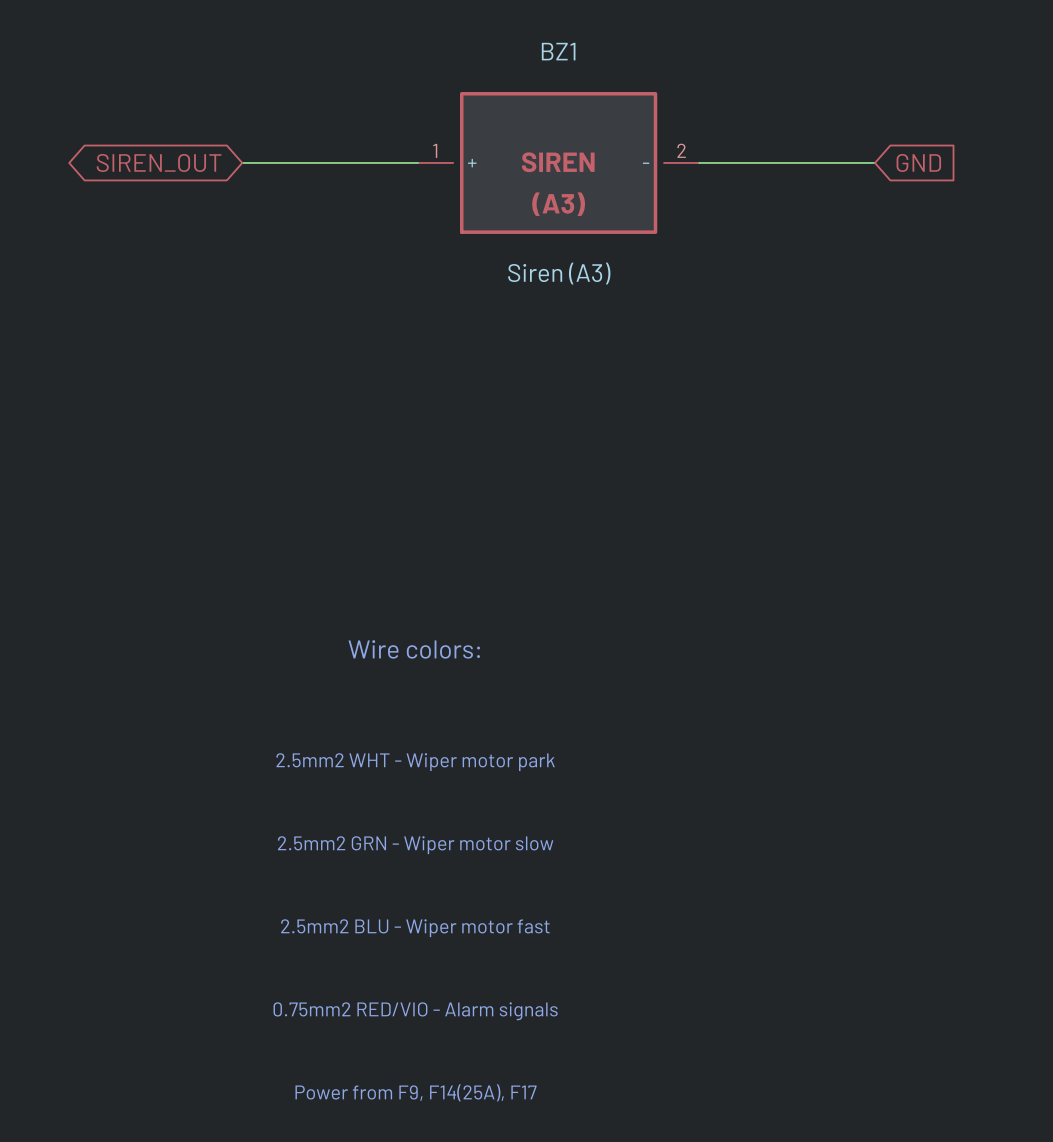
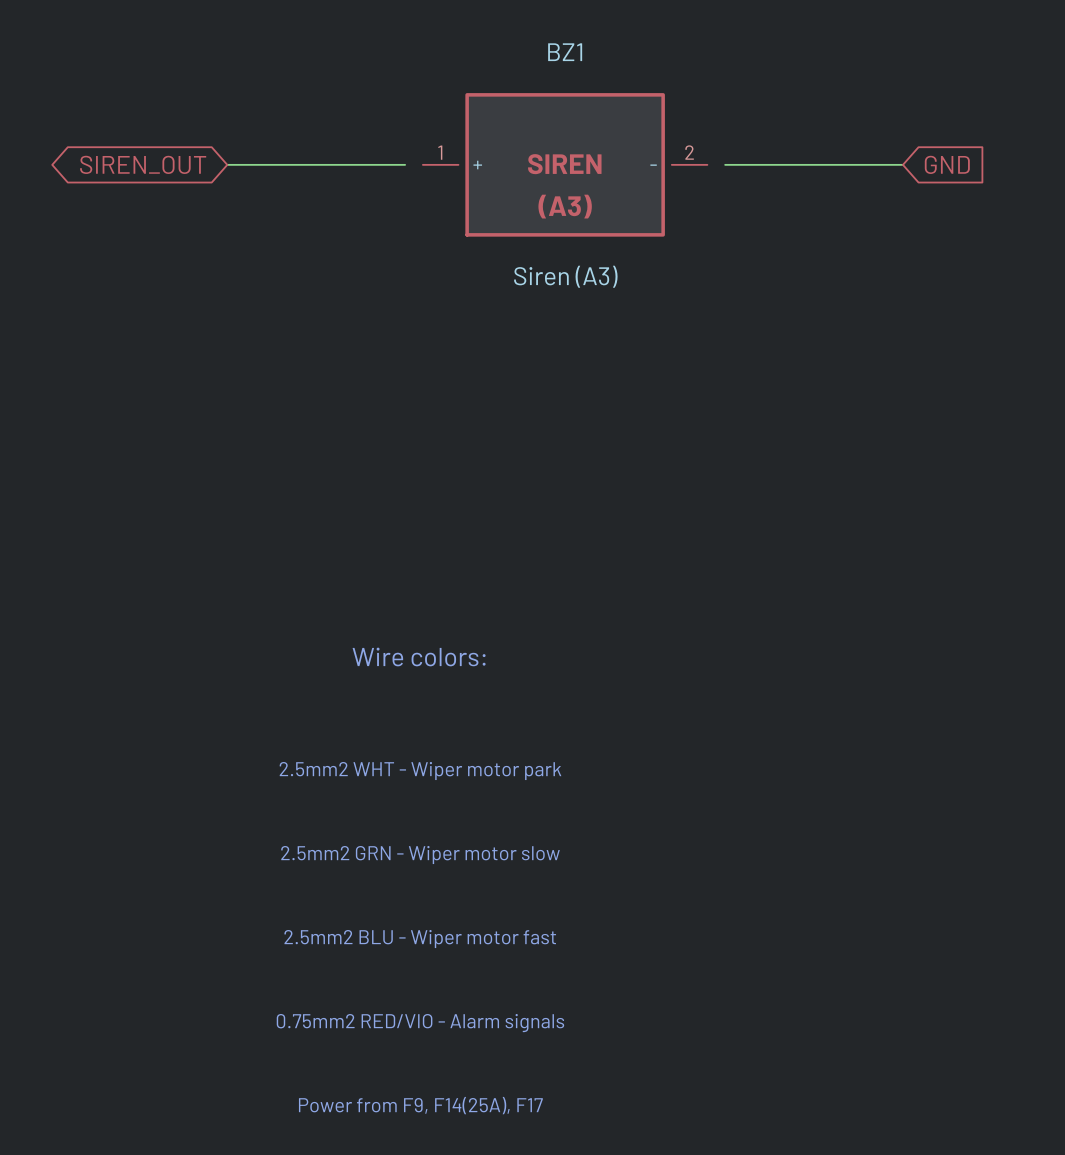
global label position: SIREN_OUT (159, 162) -> SIREN_OUT (143, 164)
wire: (400, 162) (418, 162) -> (227, 164) (245, 164)
wire: (699, 162) (716, 162) -> (885, 164) (902, 164)
global label position: GND (918, 162) -> GND (947, 164)

